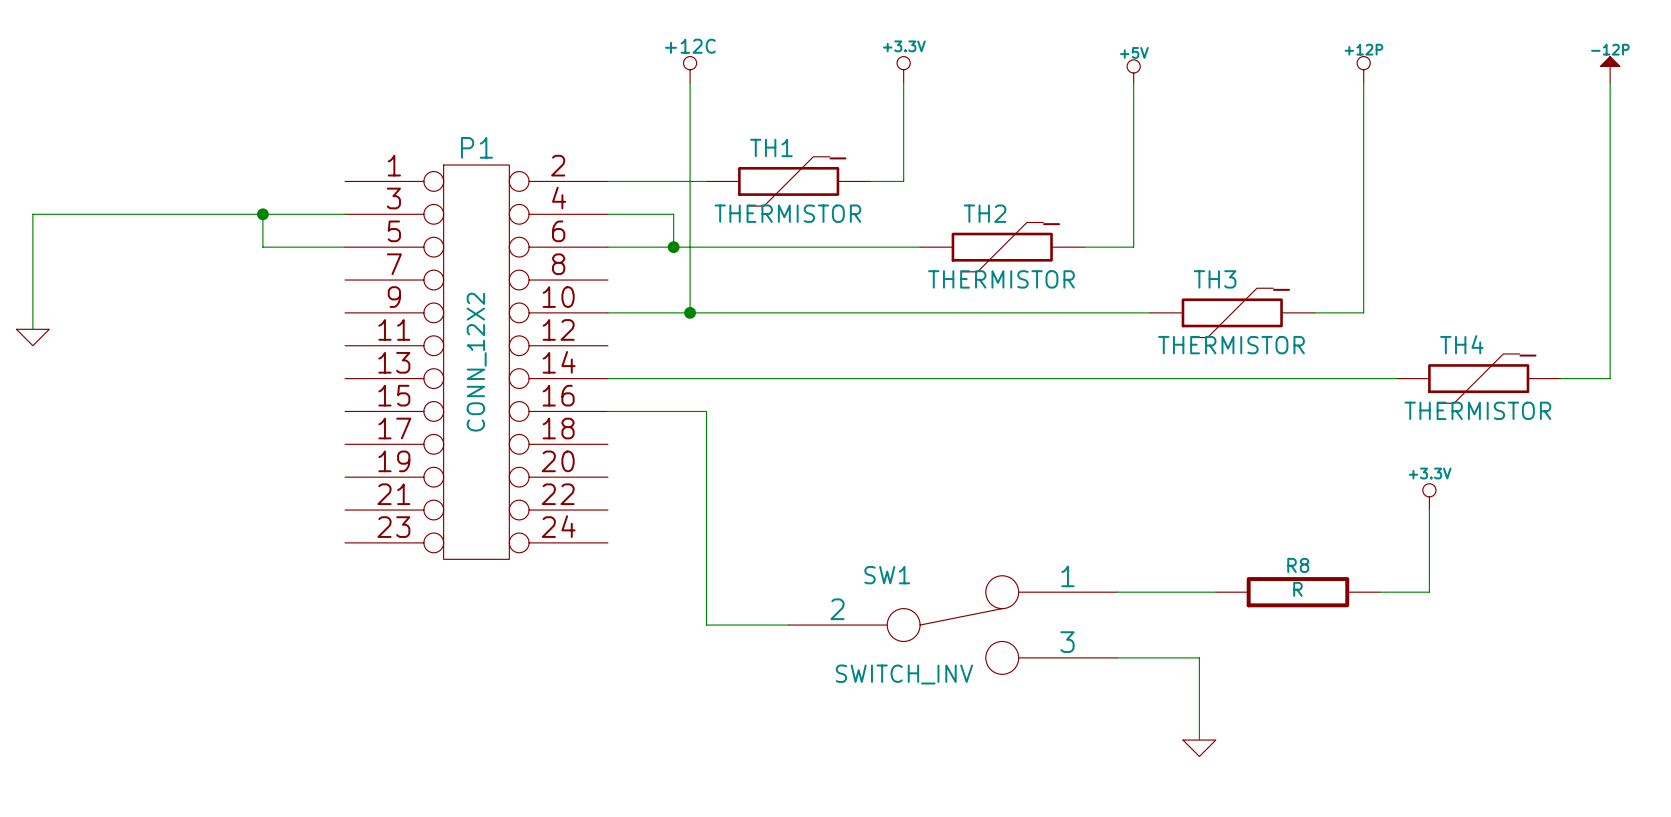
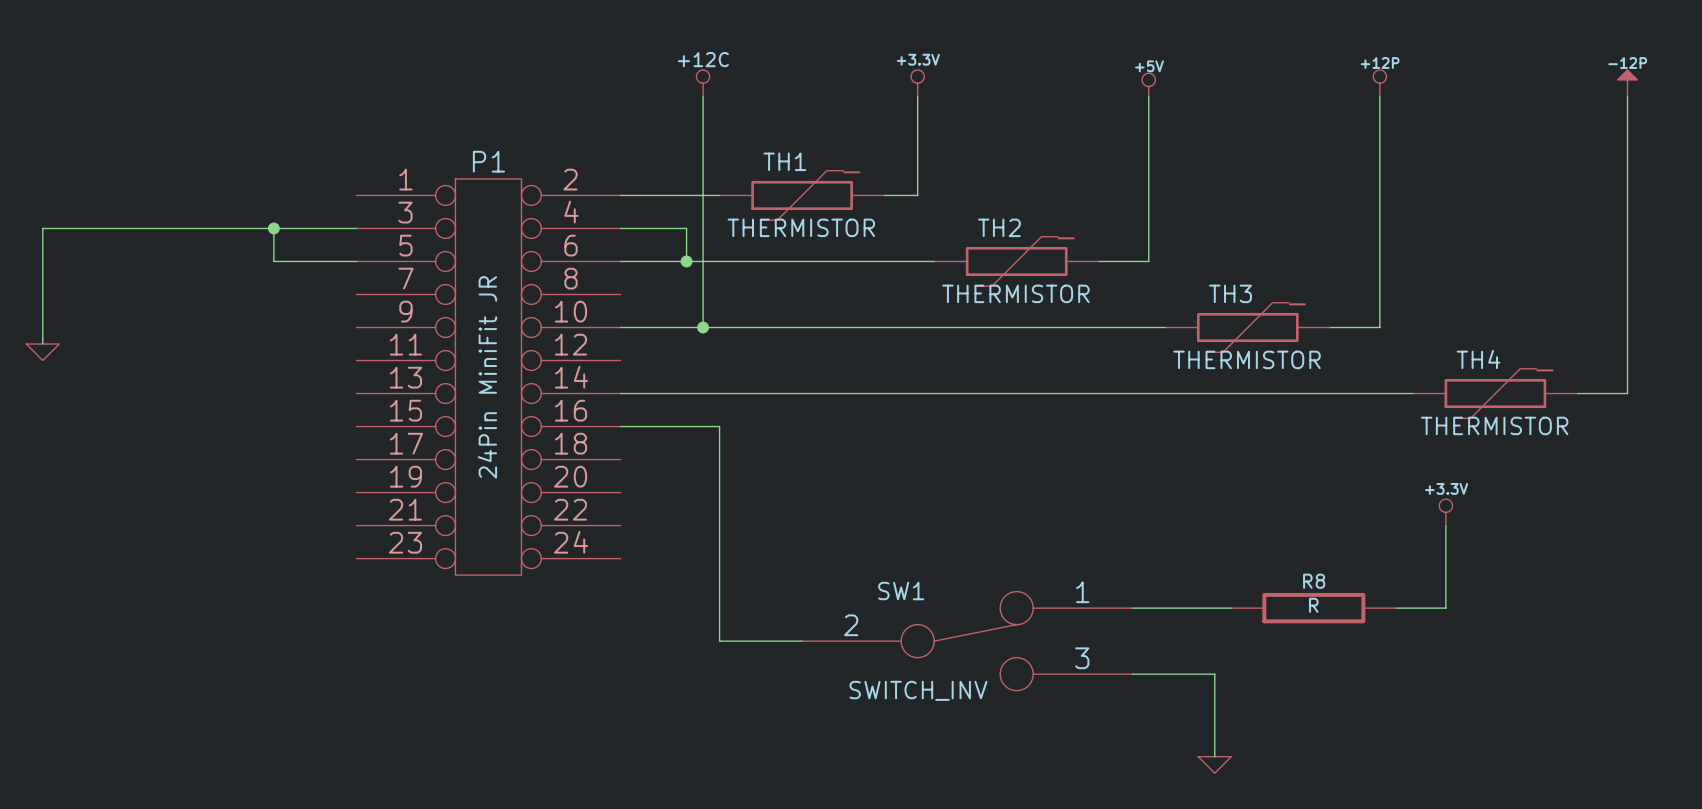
P1 value: CONN_12X2 (476, 362) -> 24Pin MiniFit JR (487, 377)

